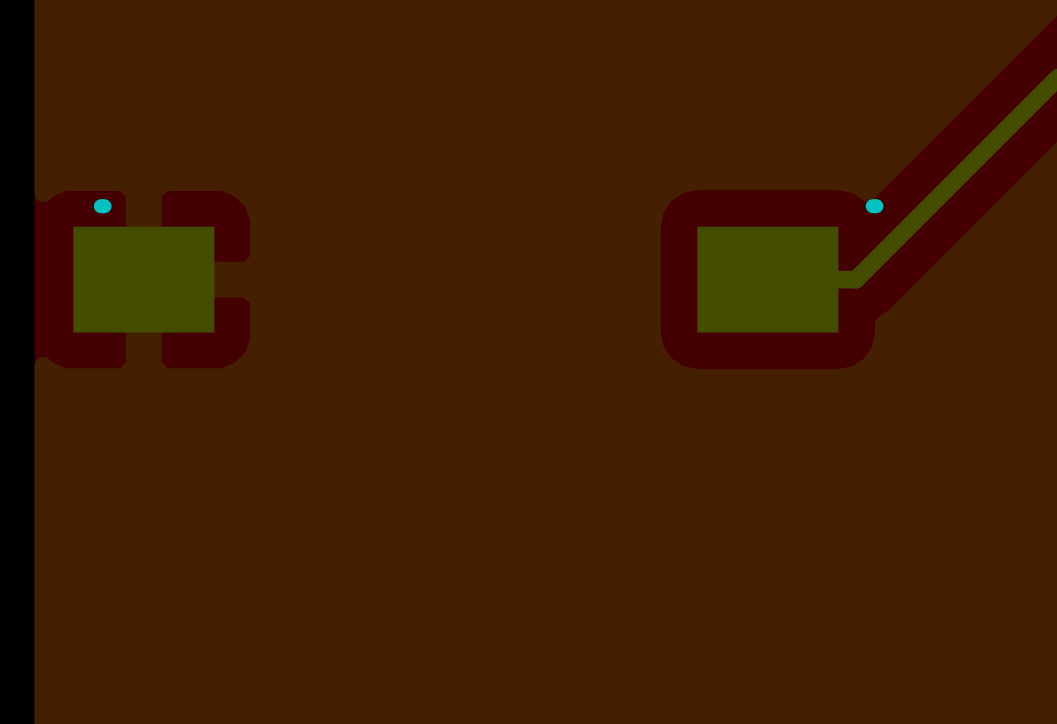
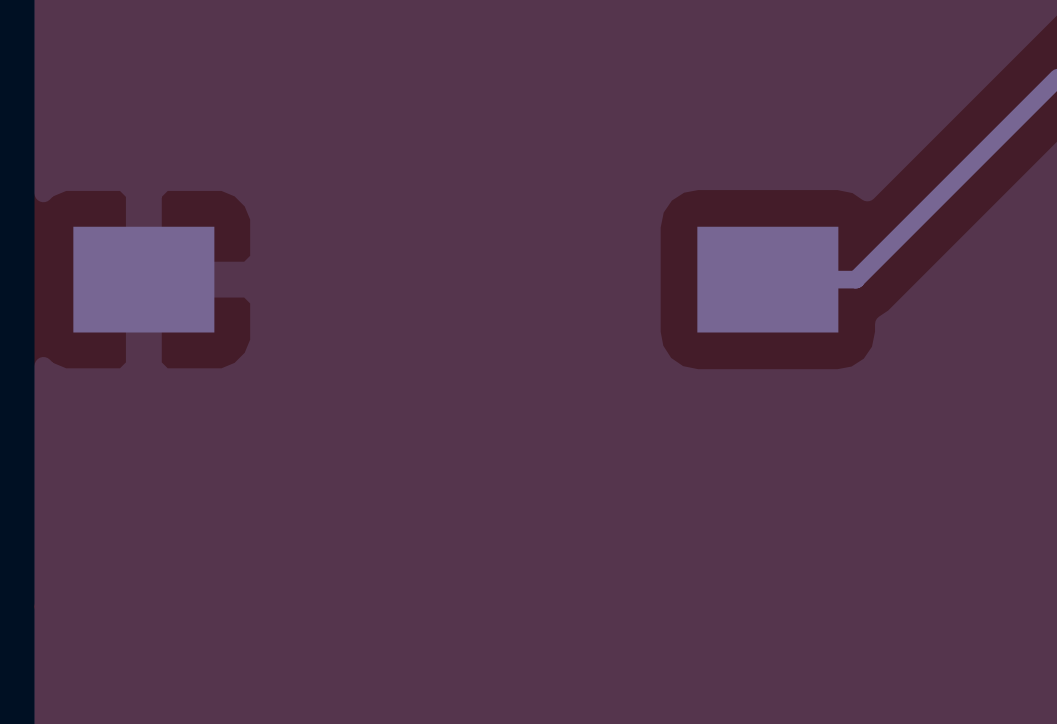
line: (100, 206) (104, 206) -> none
line: (872, 206) (876, 206) -> none

